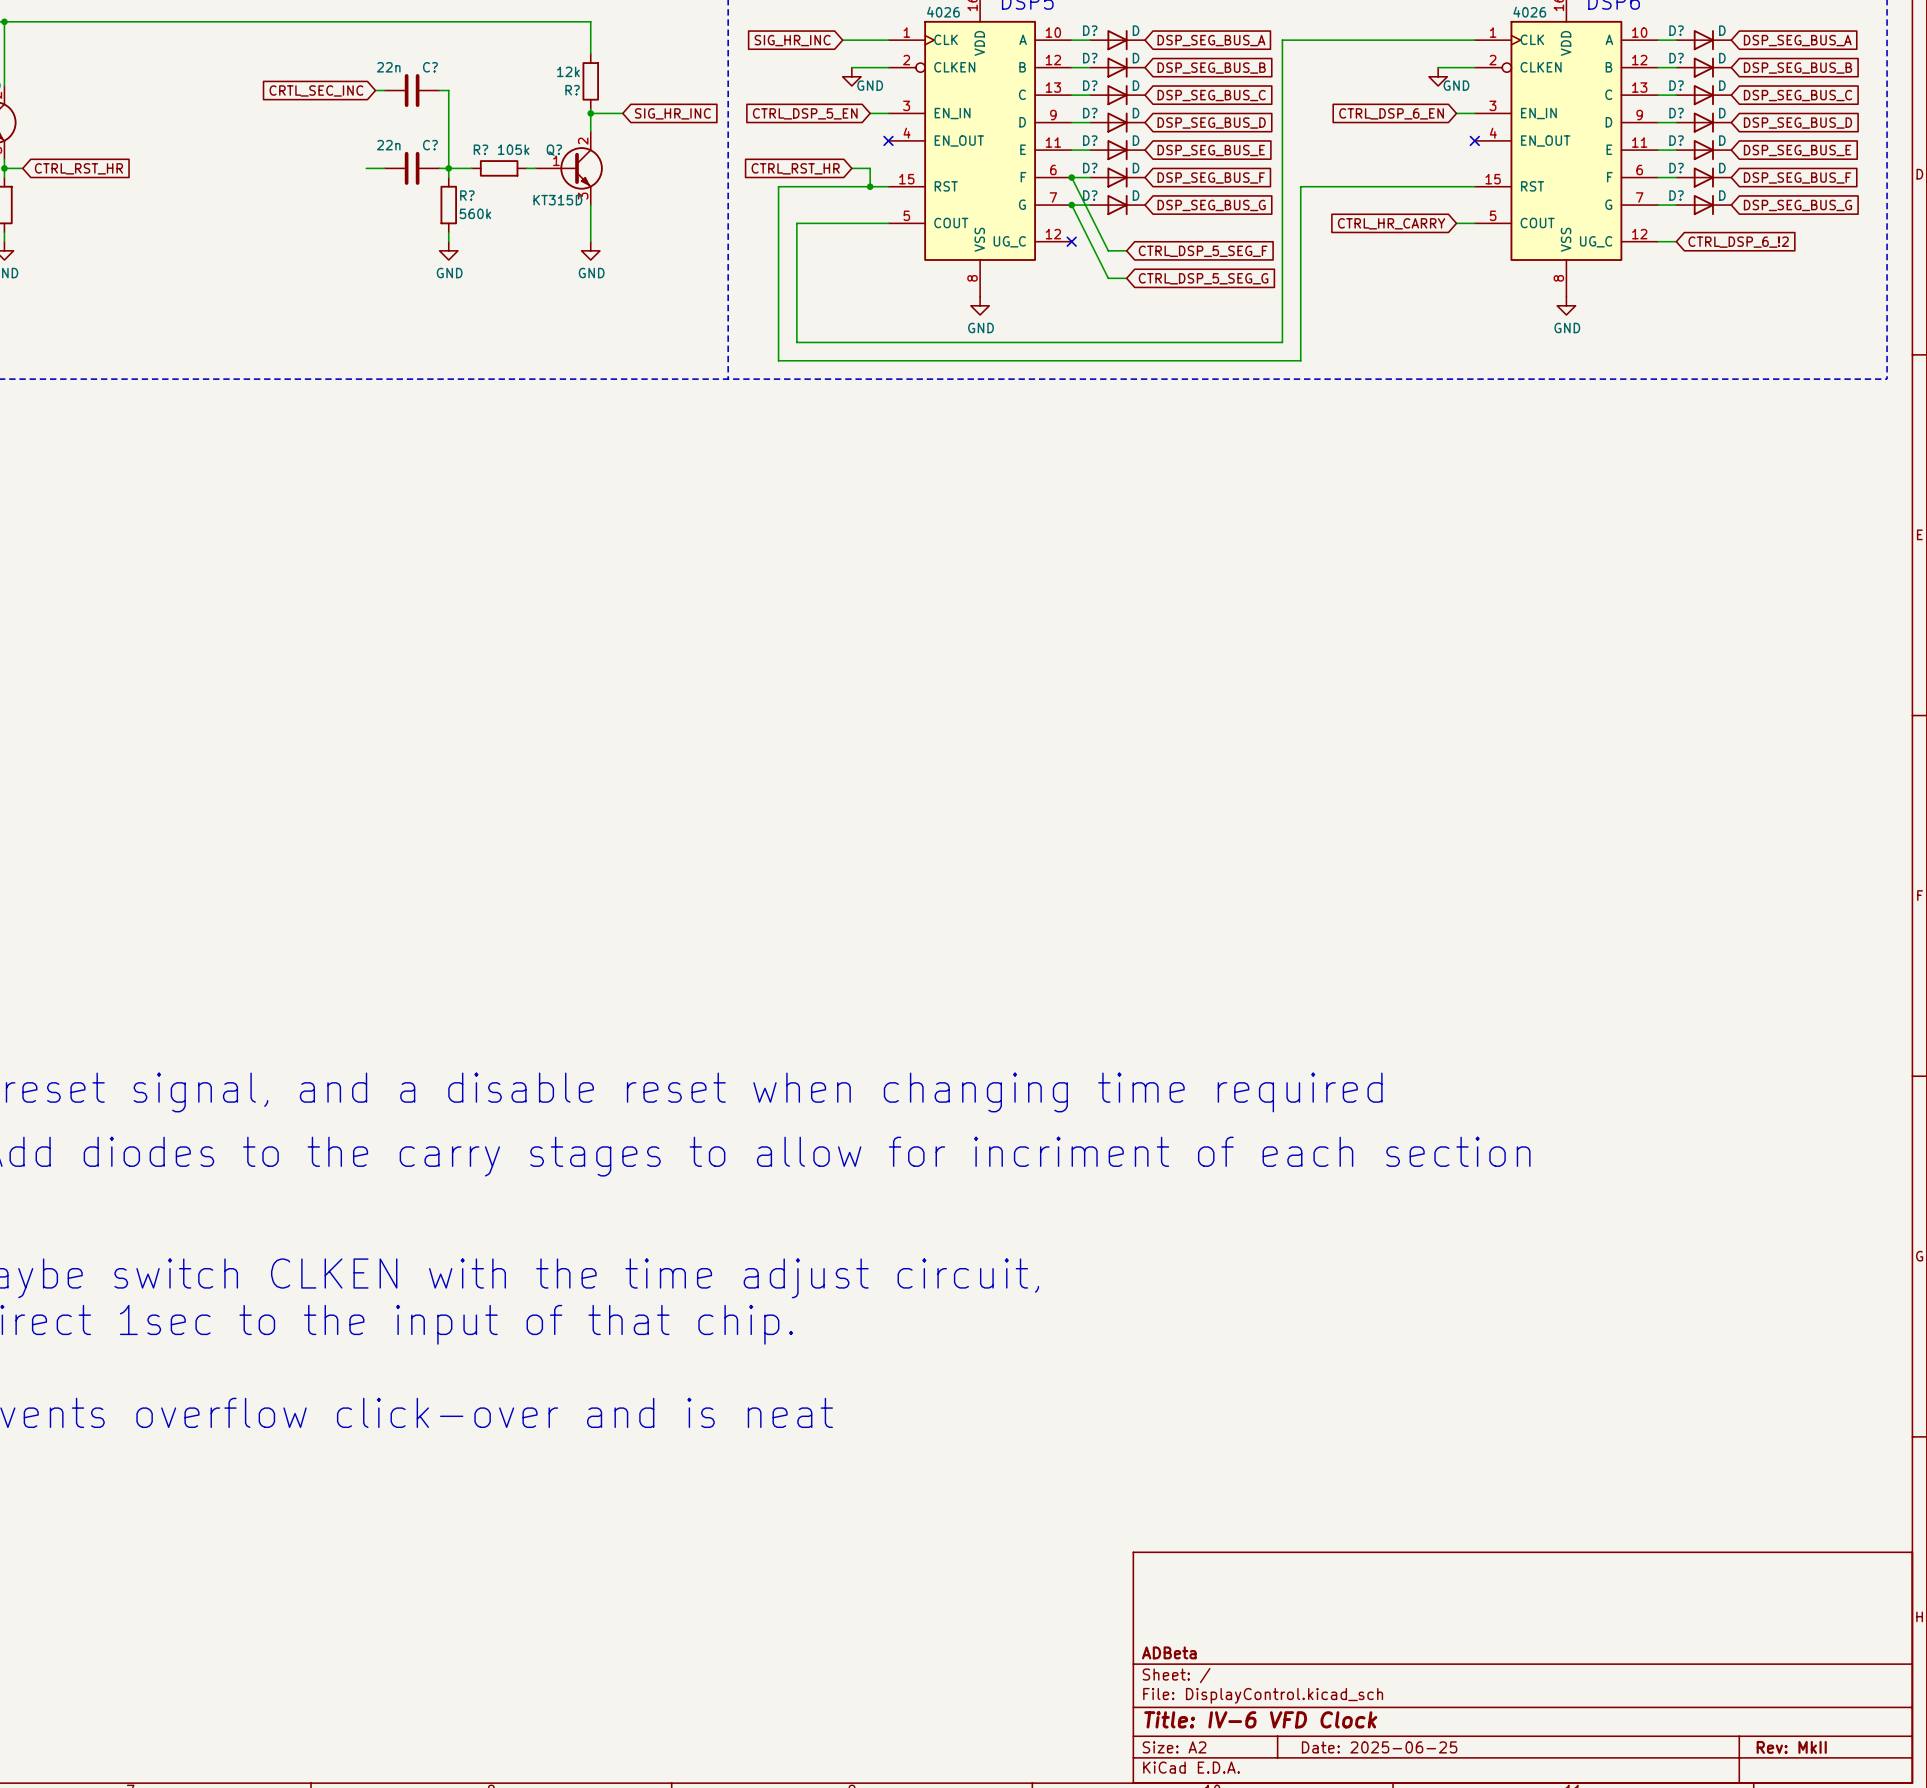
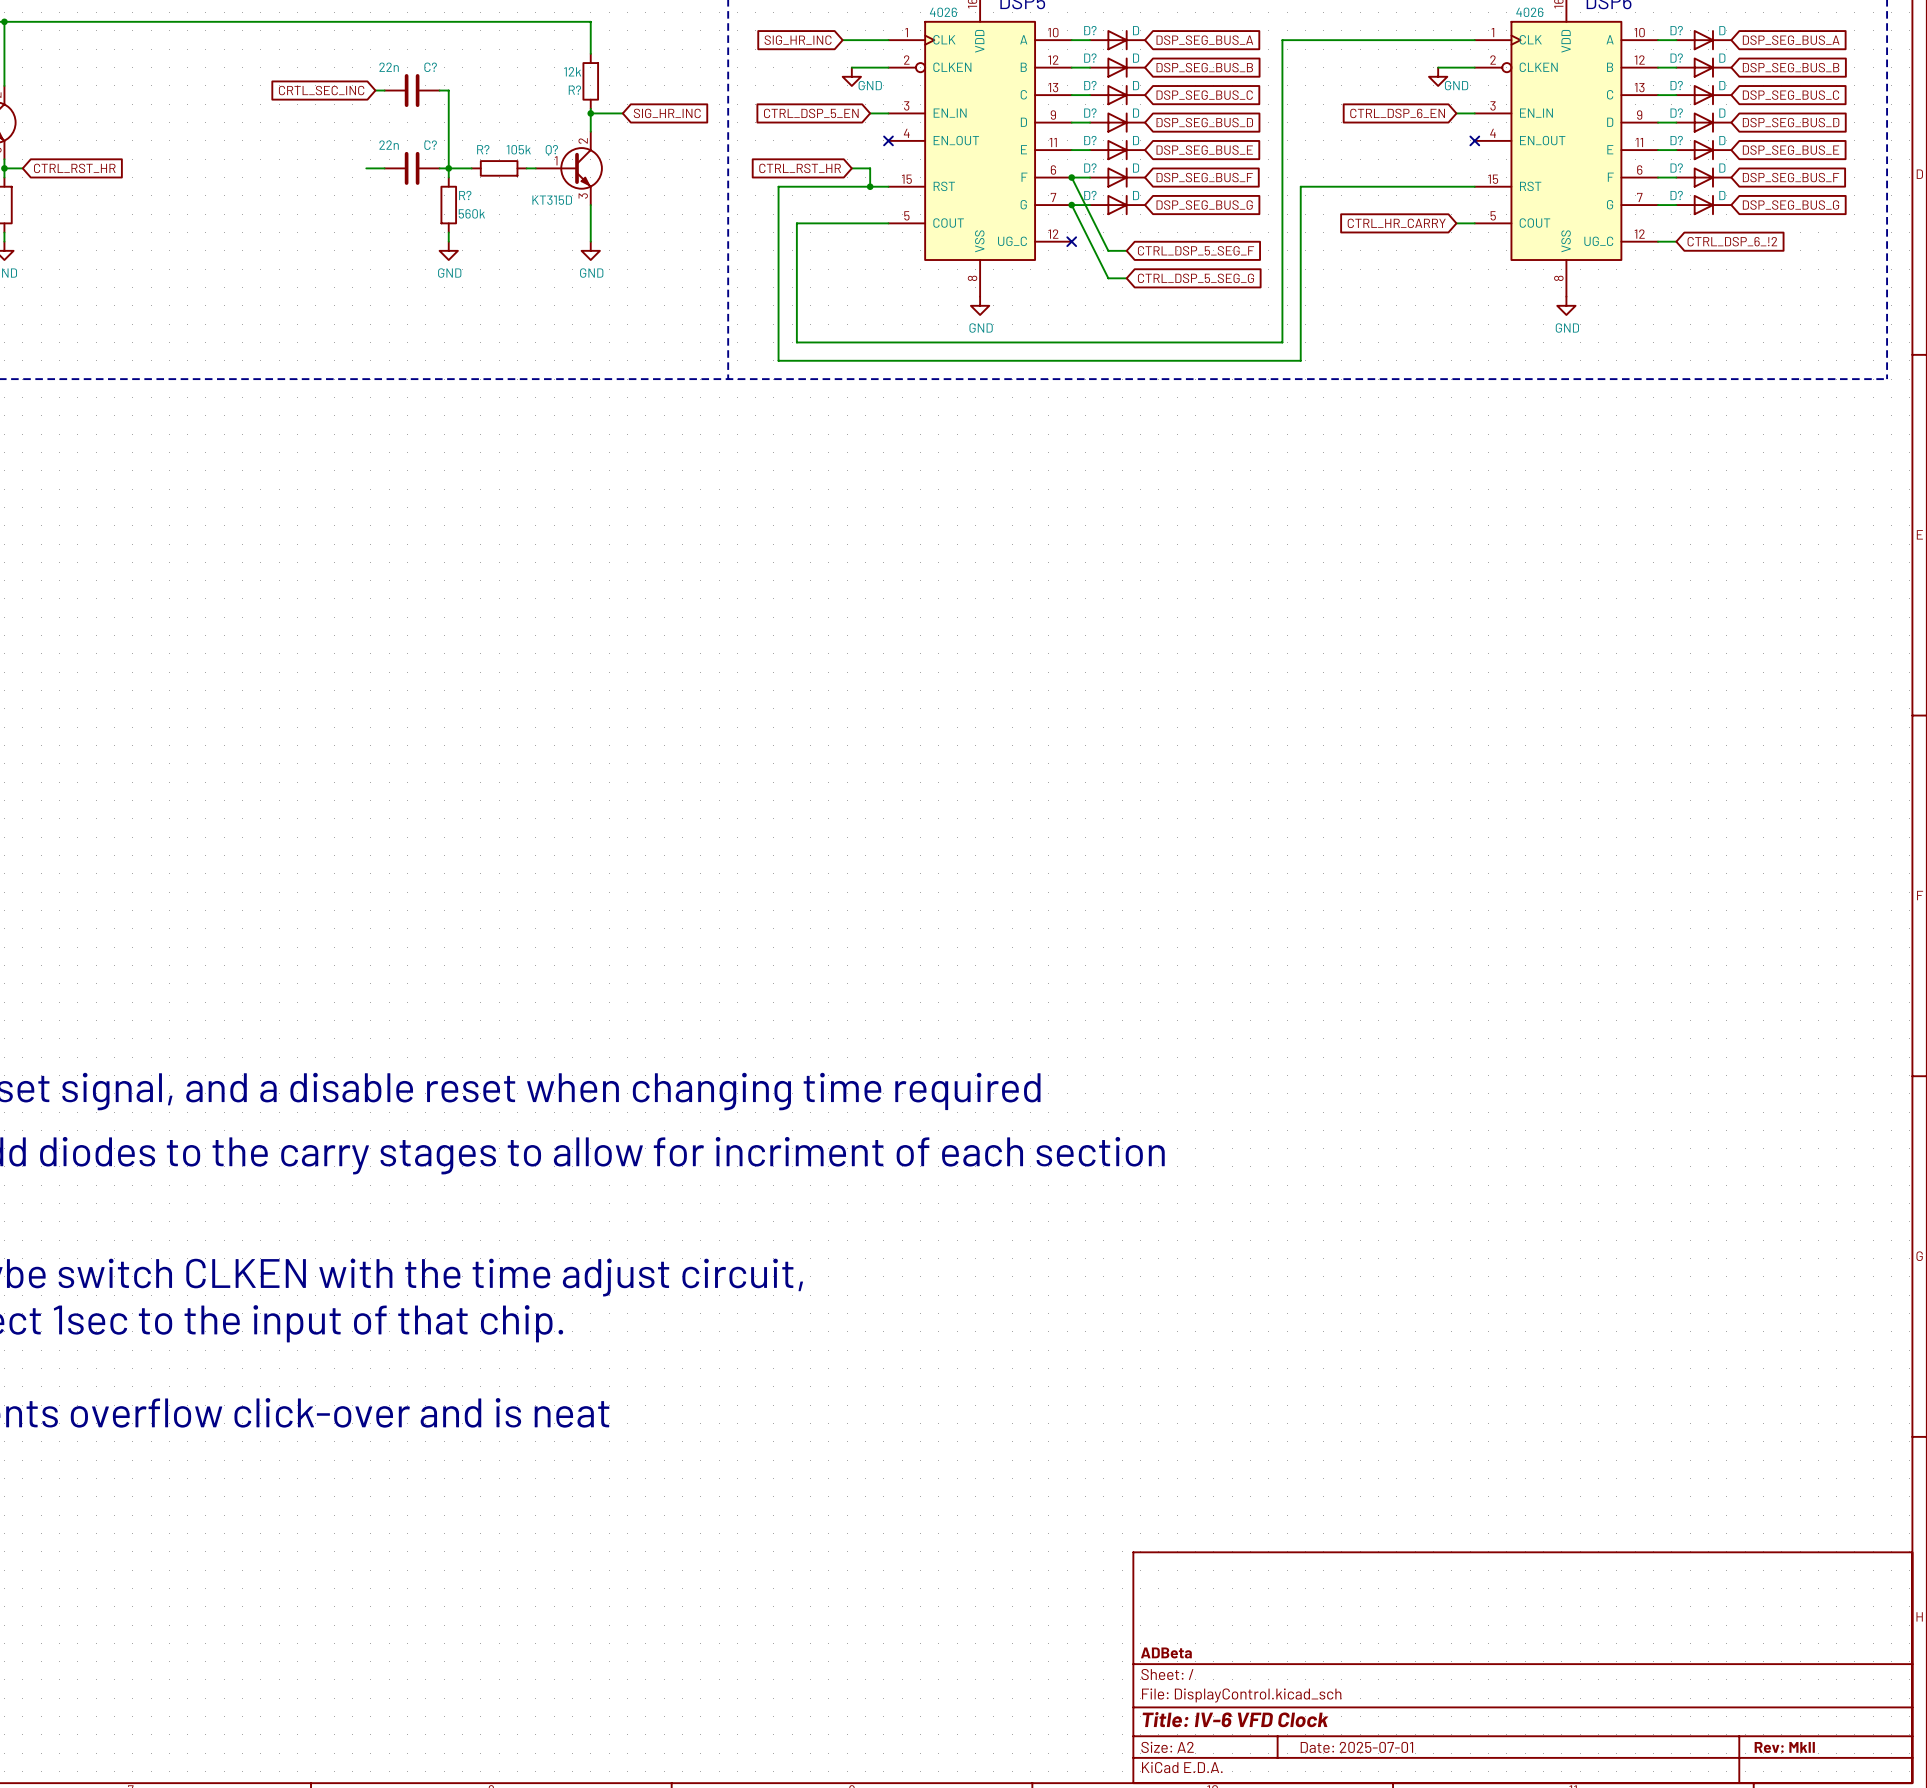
title block: Date: 2025-06-25 (1379, 1747) -> Date: 2025-07-01 (1356, 1747)

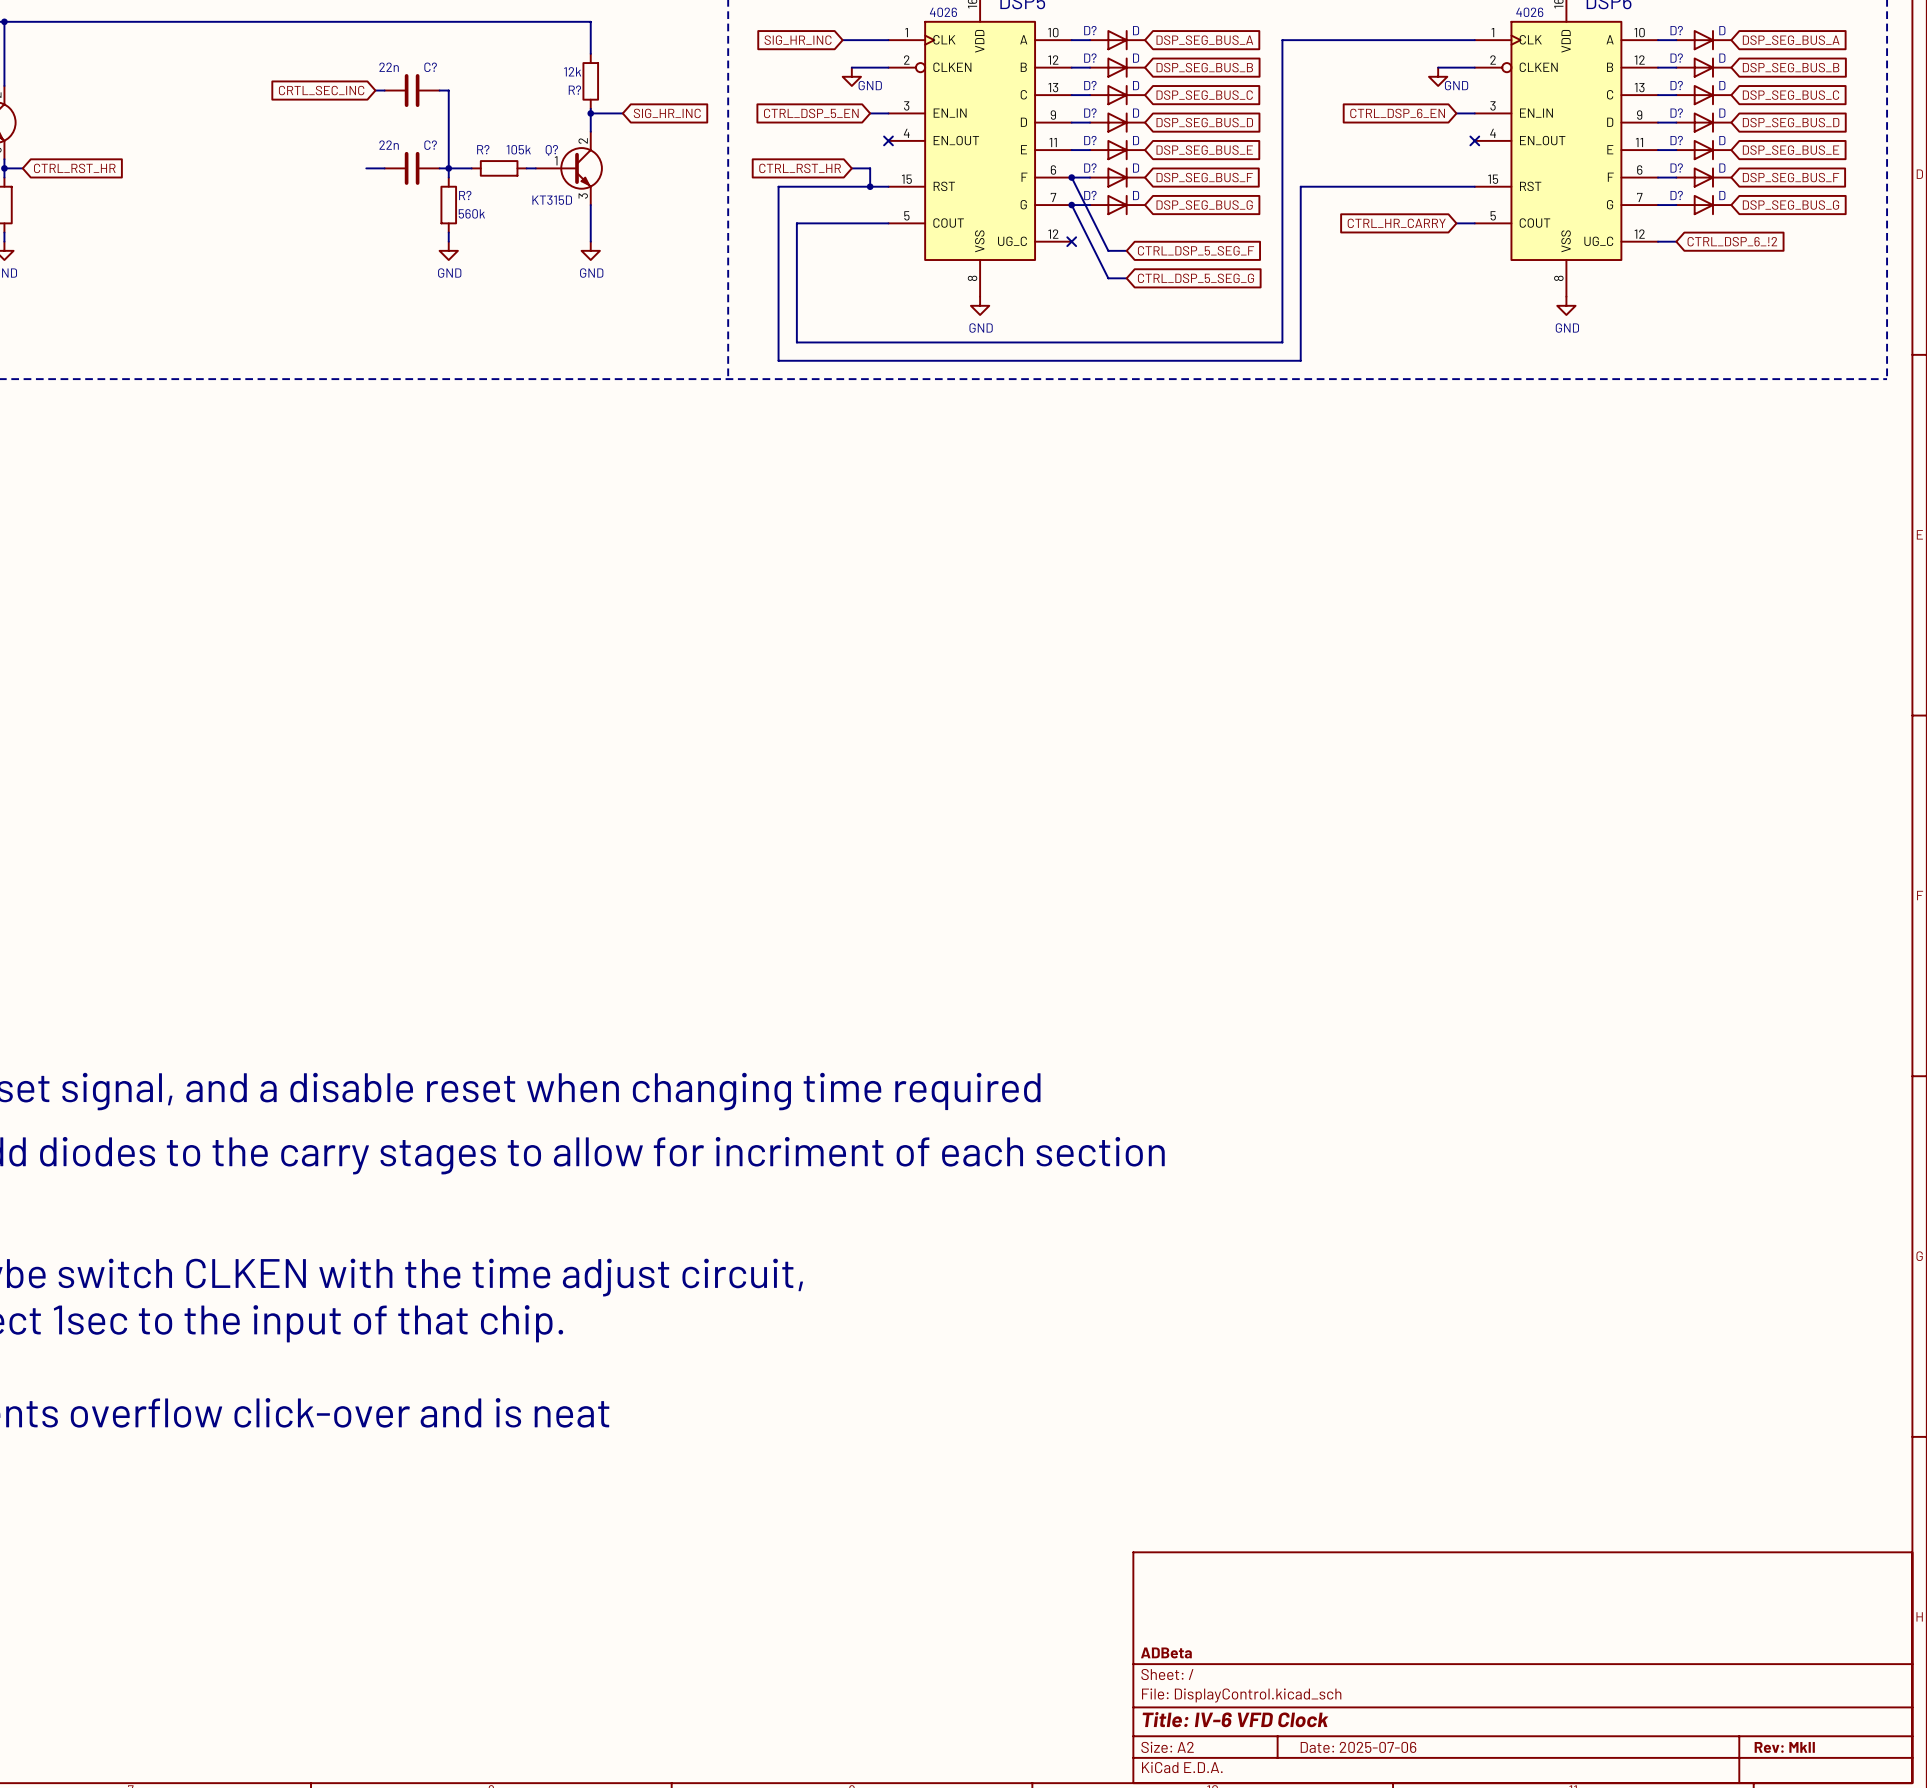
title block: Date: 2025-07-01 (1356, 1747) -> Date: 2025-07-06 (1358, 1747)

